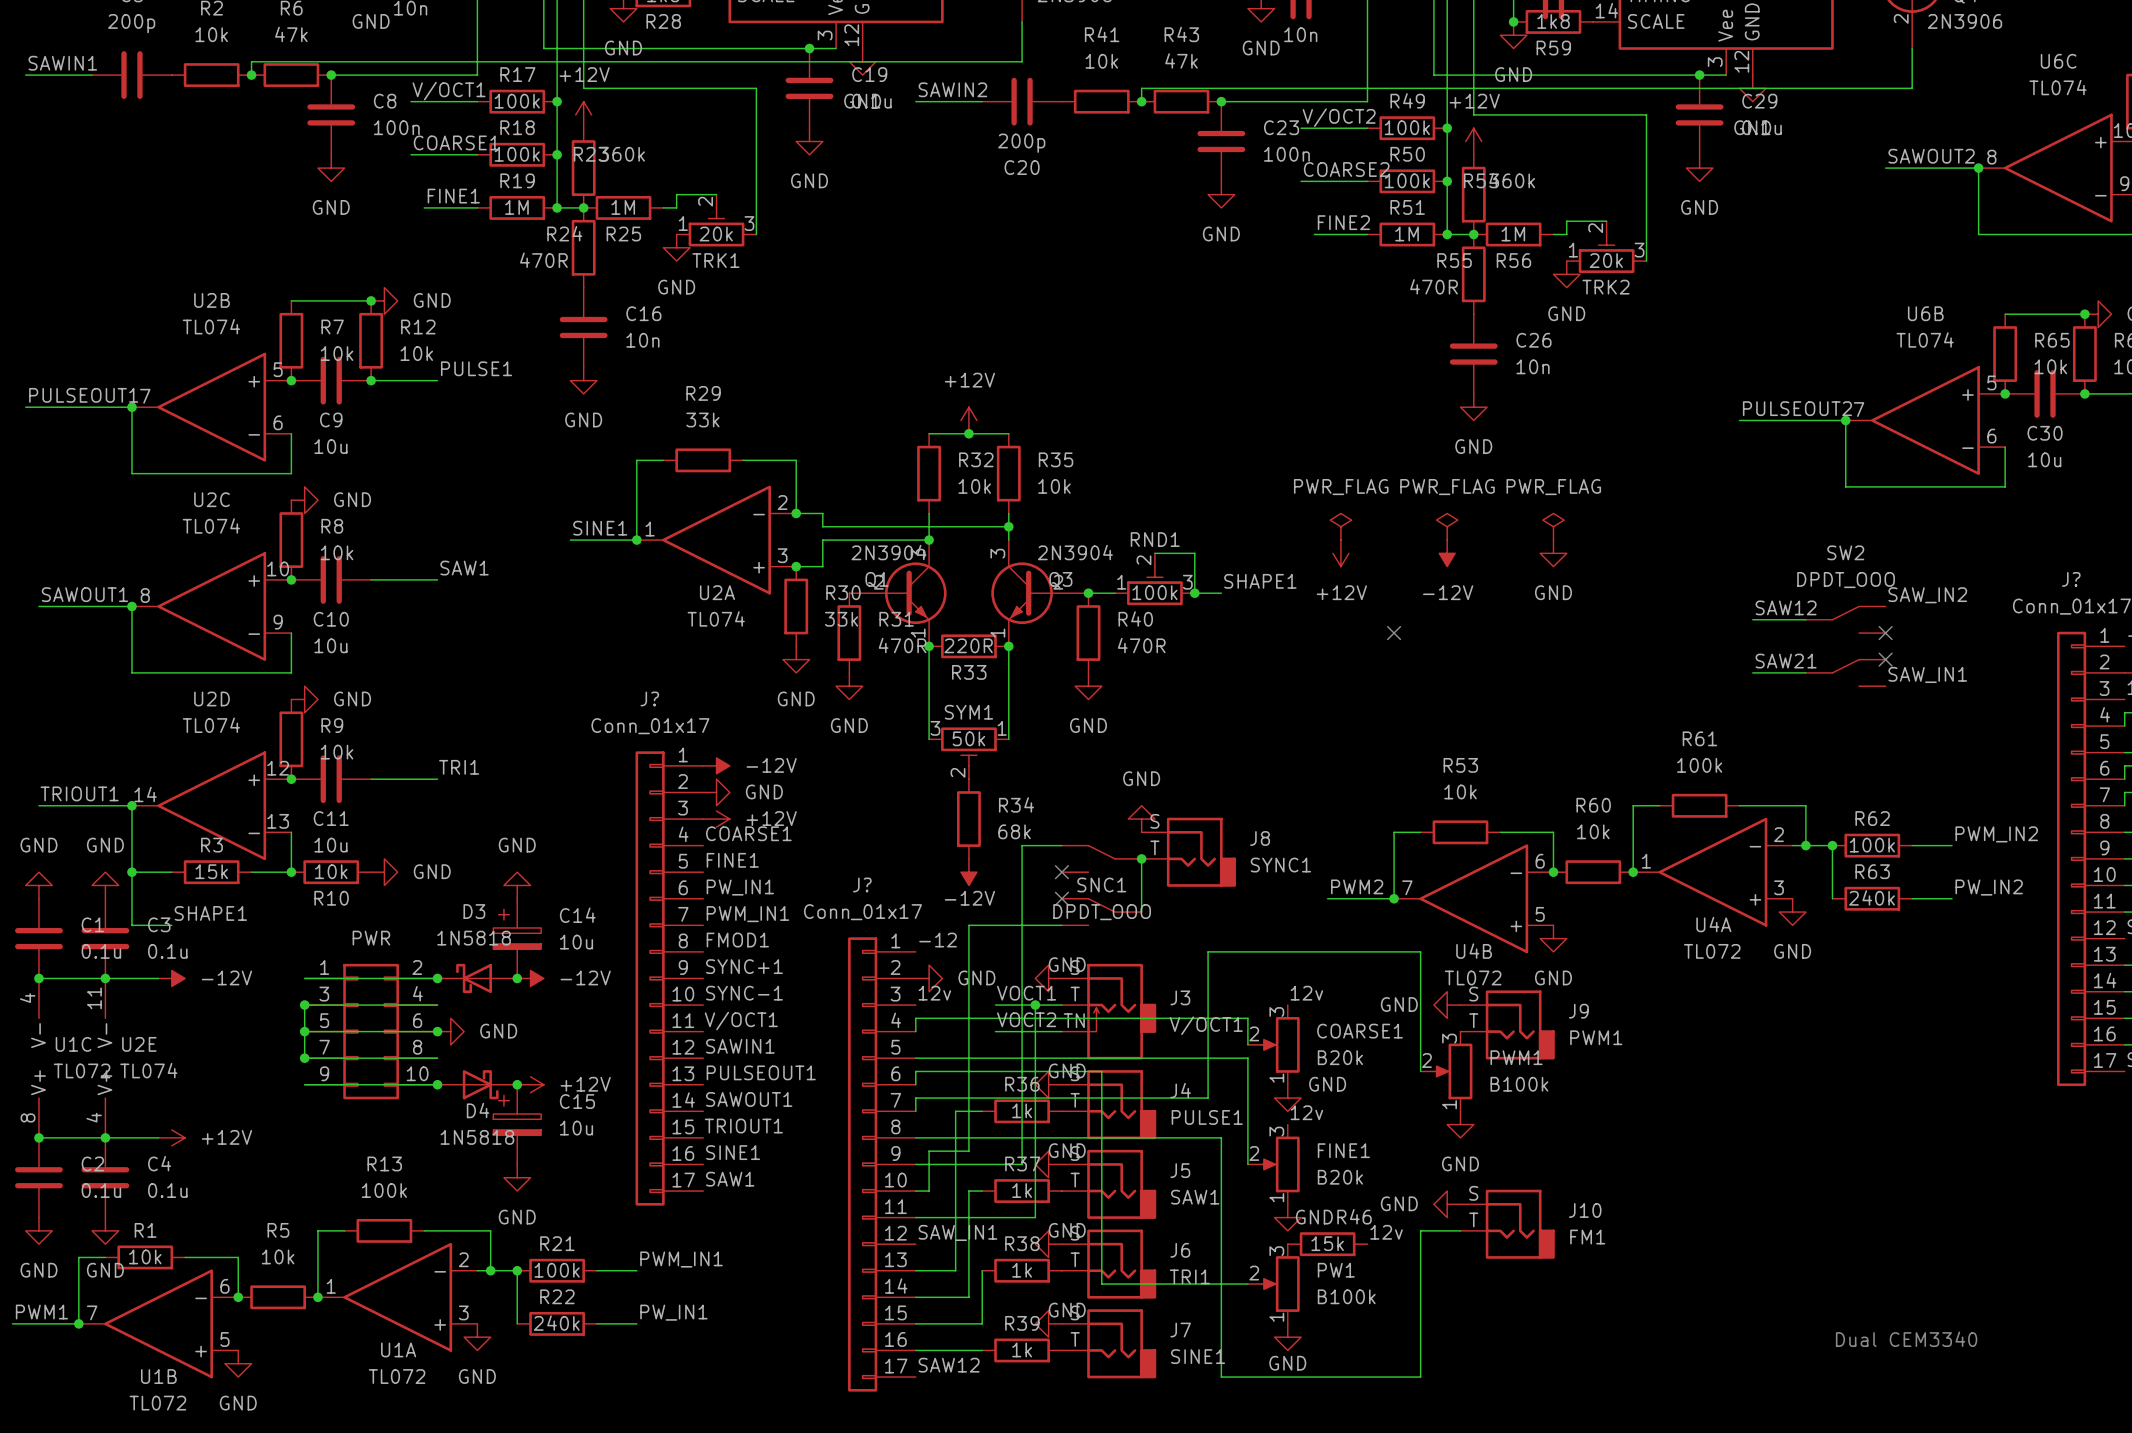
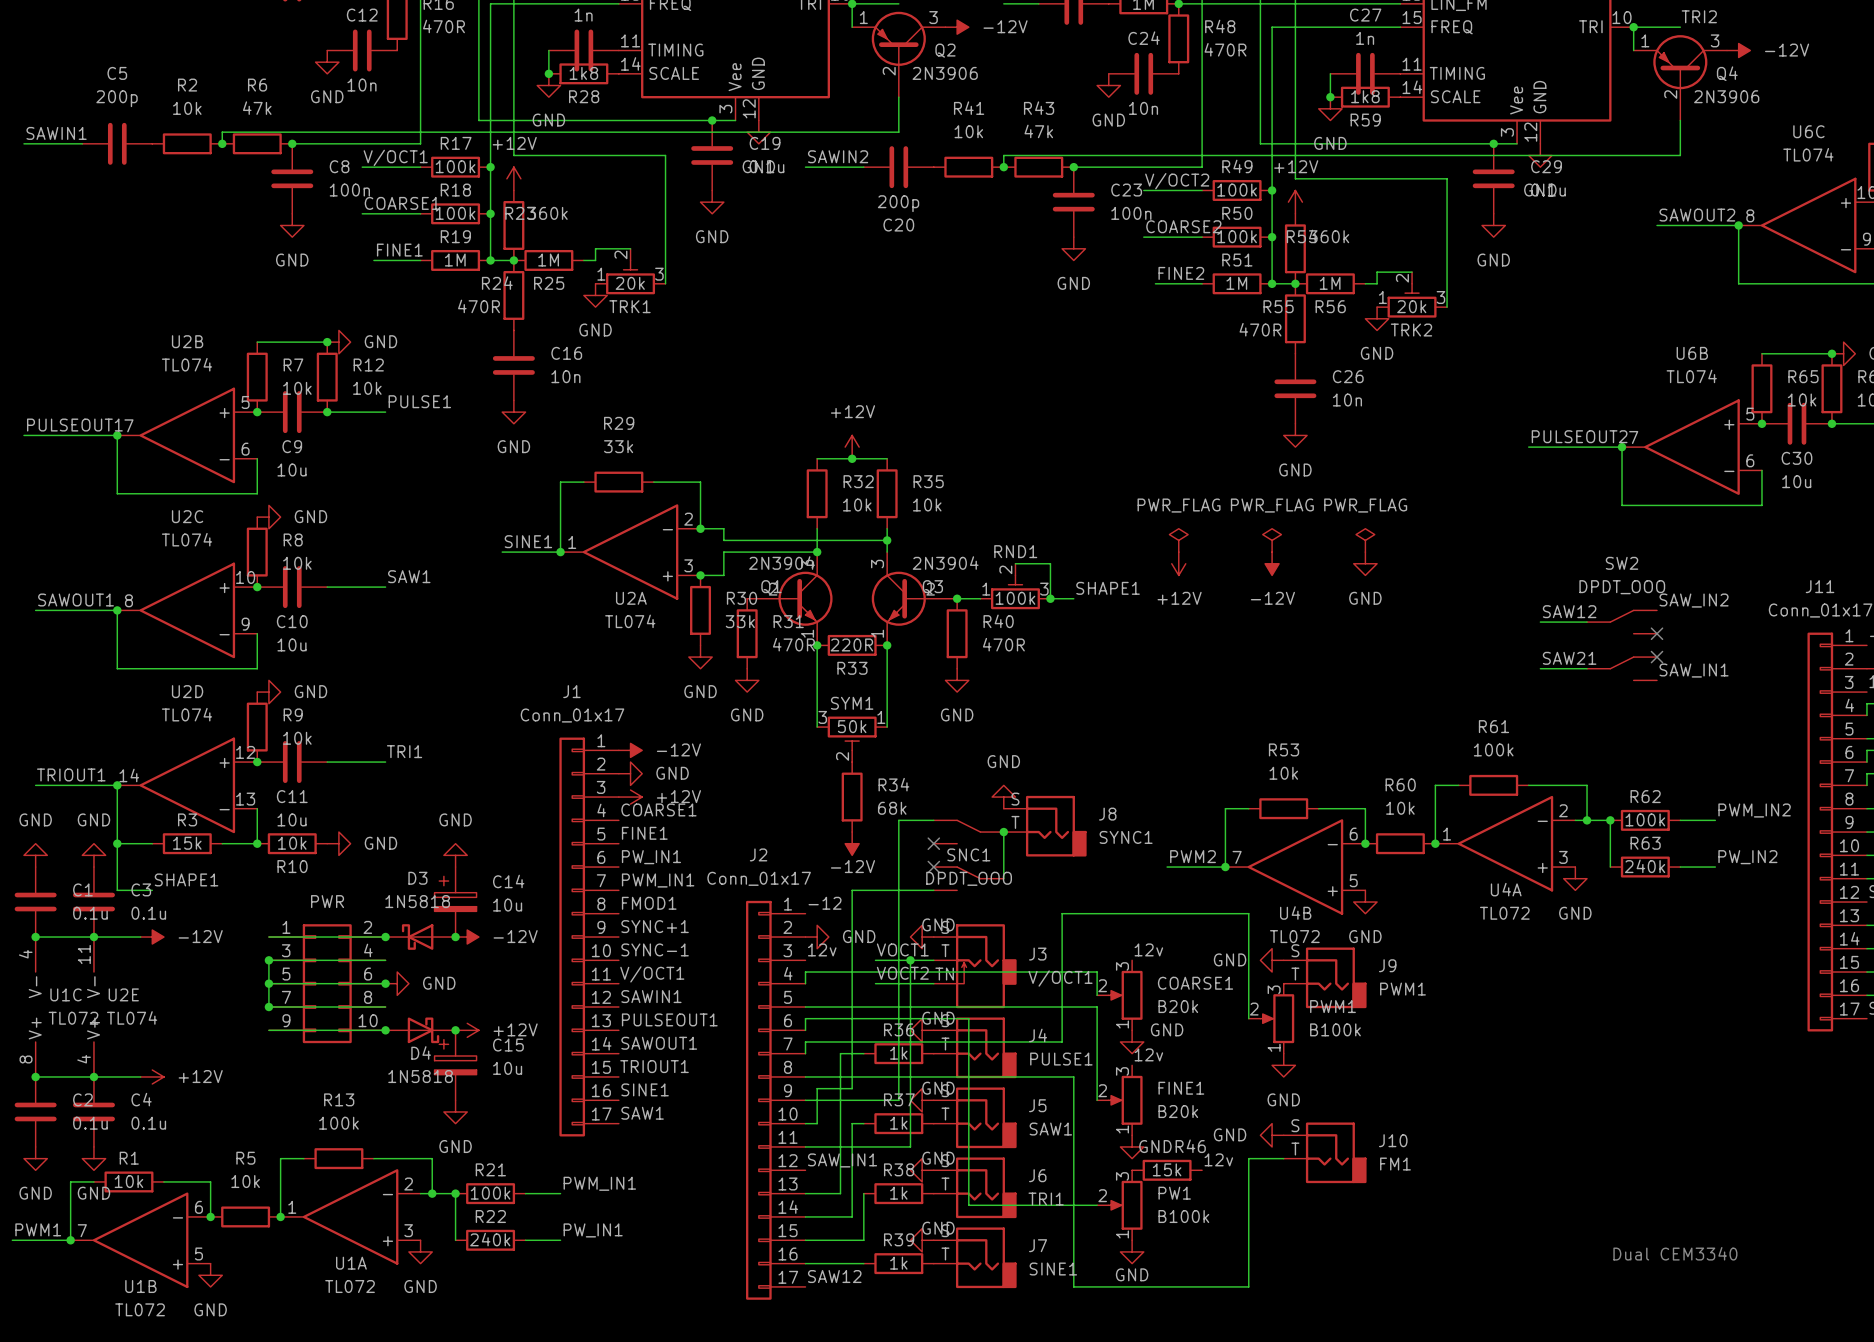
J? name: J? (2071, 579) -> J11 (1820, 586)
no-connect mark: (1394, 633) -> none
J? name: J? (649, 698) -> J1 (571, 691)
J? name: J? (862, 884) -> J2 (758, 854)

